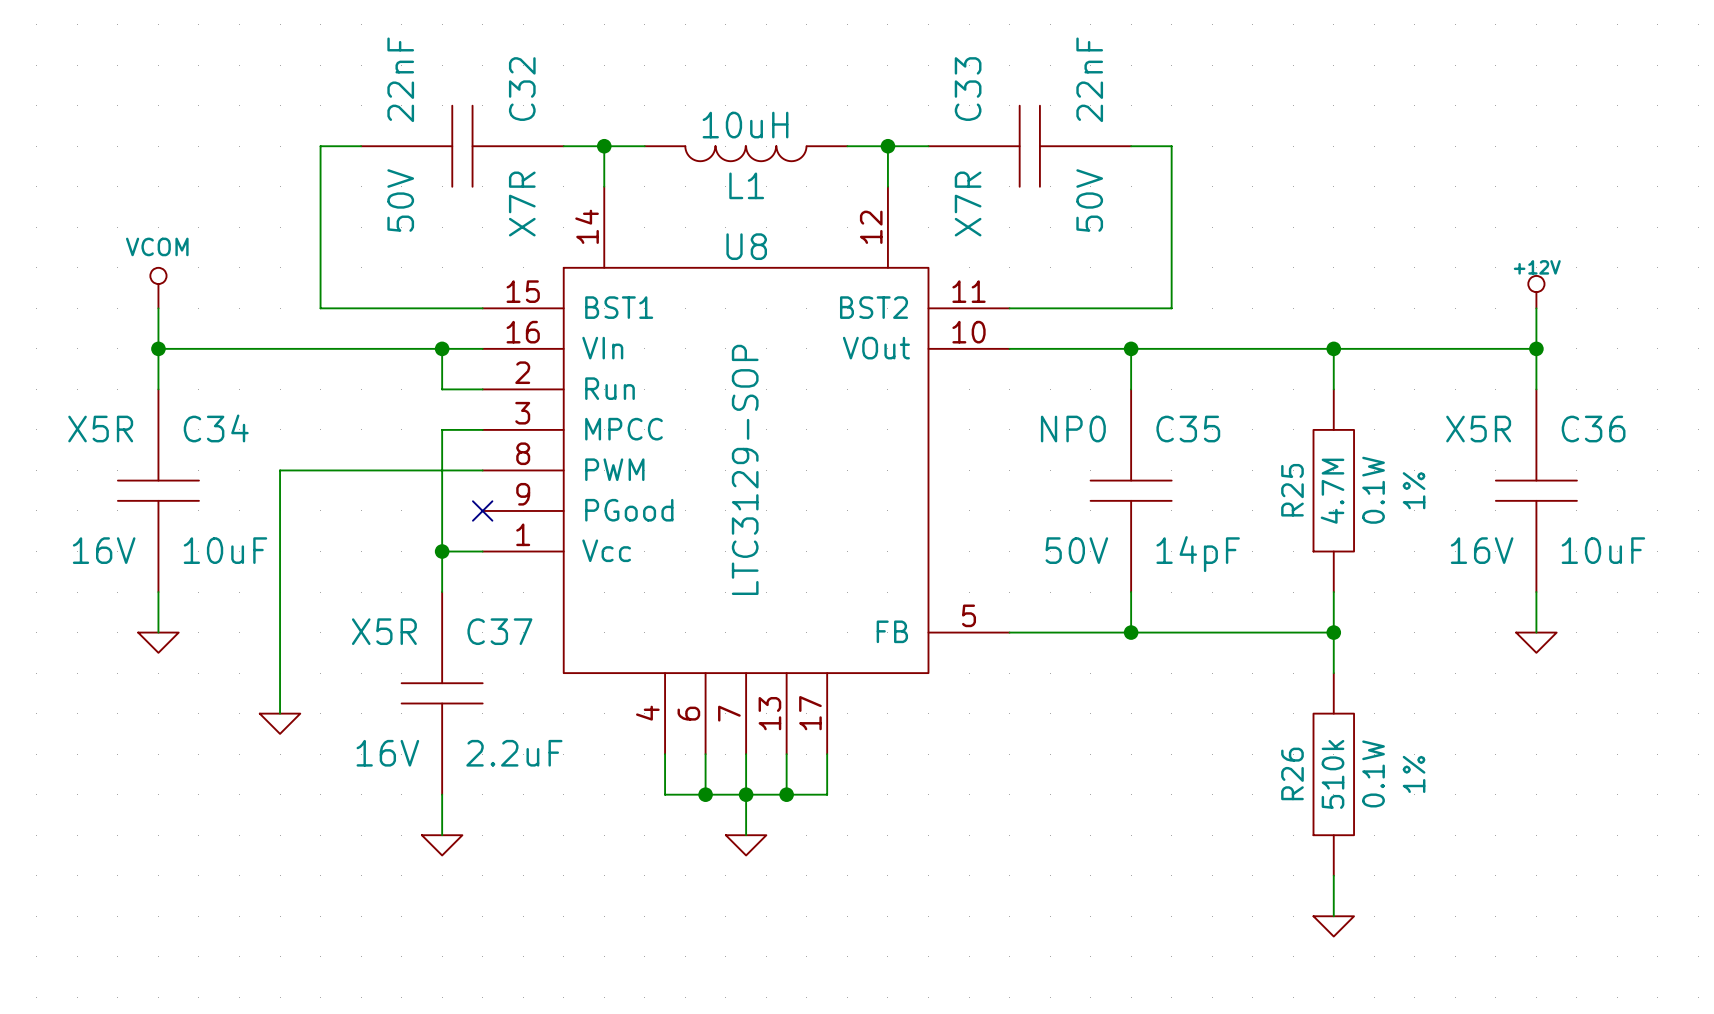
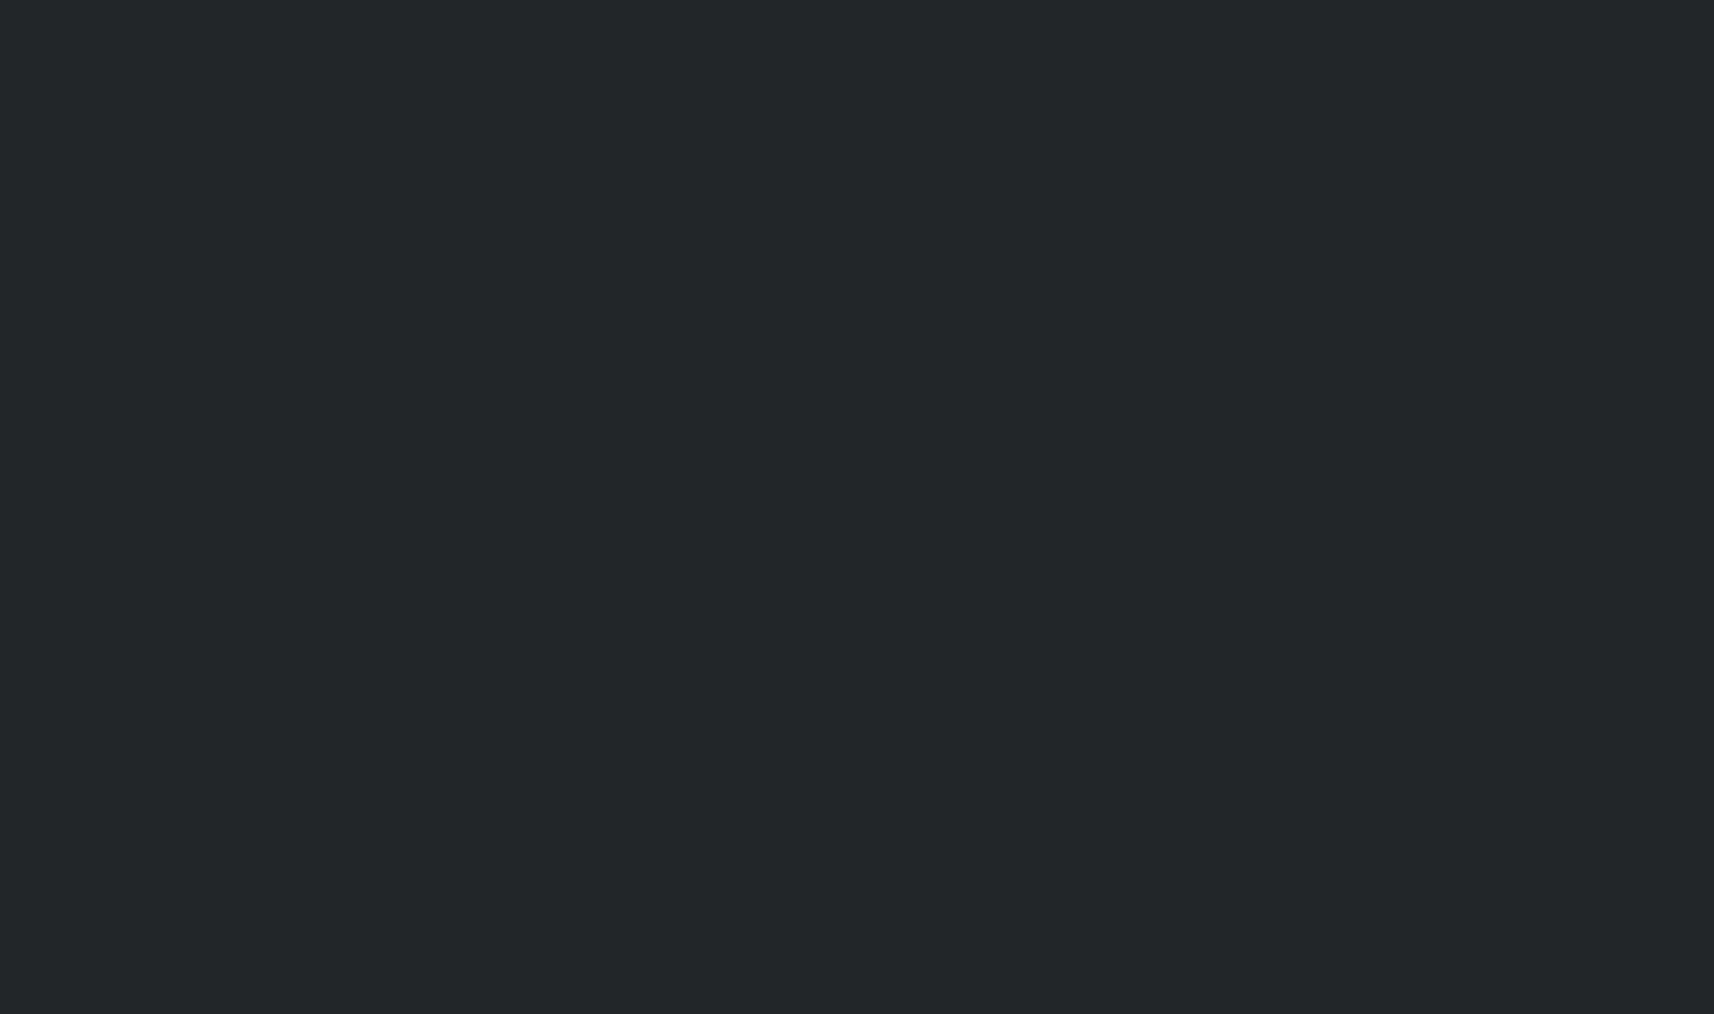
wire: (361, 146) (320, 146) (320, 308) (482, 308) -> none
C32: 22nF (462, 146) -> none
wire: (563, 146) (644, 146) -> none
wire: (604, 146) (604, 186) -> none
junction: (604, 146) -> none
wire: (847, 146) (928, 146) -> none
wire: (887, 146) (887, 186) -> none
junction: (887, 146) -> none
C33: 22nF (1029, 146) -> none
wire: (1131, 146) (1171, 146) (1171, 308) (1009, 308) -> none
L1: 10uH (746, 153) -> none
power symbol: VCOM (158, 288) -> none
power symbol: +12V (1536, 292) -> none
wire: (158, 308) (158, 389) -> none
wire: (1536, 308) (1536, 389) -> none
wire: (158, 348) (482, 348) -> none
junction: (158, 348) -> none
wire: (442, 348) (442, 389) (482, 389) -> none
junction: (442, 348) -> none
wire: (1009, 348) (1536, 348) -> none
wire: (1131, 348) (1131, 389) -> none
junction: (1131, 348) -> none
wire: (1333, 348) (1333, 389) -> none
junction: (1333, 348) -> none
junction: (1536, 348) -> none
wire: (482, 429) (442, 429) (442, 592) -> none
wire: (482, 470) (280, 470) (280, 713) -> none
U8: LTC3129-SOP (746, 470) -> none
C34: 10uF (158, 490) -> none
C35: 14pF (1131, 490) -> none
R25: 4.7M (1333, 490) -> none
C36: 10uF (1536, 490) -> none
no-connect mark: (482, 510) -> none
wire: (442, 551) (482, 551) -> none
junction: (442, 551) -> none
wire: (158, 592) (158, 632) -> none
wire: (1131, 592) (1131, 632) -> none
wire: (1333, 592) (1333, 673) -> none
wire: (1536, 592) (1536, 632) -> none
wire: (1009, 632) (1333, 632) -> none
junction: (1131, 632) -> none
junction: (1333, 632) -> none
power symbol: (158, 642) -> none
power symbol: (1536, 642) -> none
C37: 2.2uF (442, 693) -> none
power symbol: (280, 723) -> none
wire: (665, 754) (665, 794) (827, 794) (827, 754) -> none
wire: (705, 754) (705, 794) -> none
wire: (746, 754) (746, 835) -> none
wire: (786, 754) (786, 794) -> none
R26: 510k (1333, 774) -> none
wire: (442, 794) (442, 835) -> none
junction: (705, 794) -> none
junction: (746, 794) -> none
junction: (786, 794) -> none
power symbol: (442, 845) -> none
power symbol: (746, 845) -> none
wire: (1333, 875) (1333, 916) -> none
power symbol: (1333, 926) -> none

